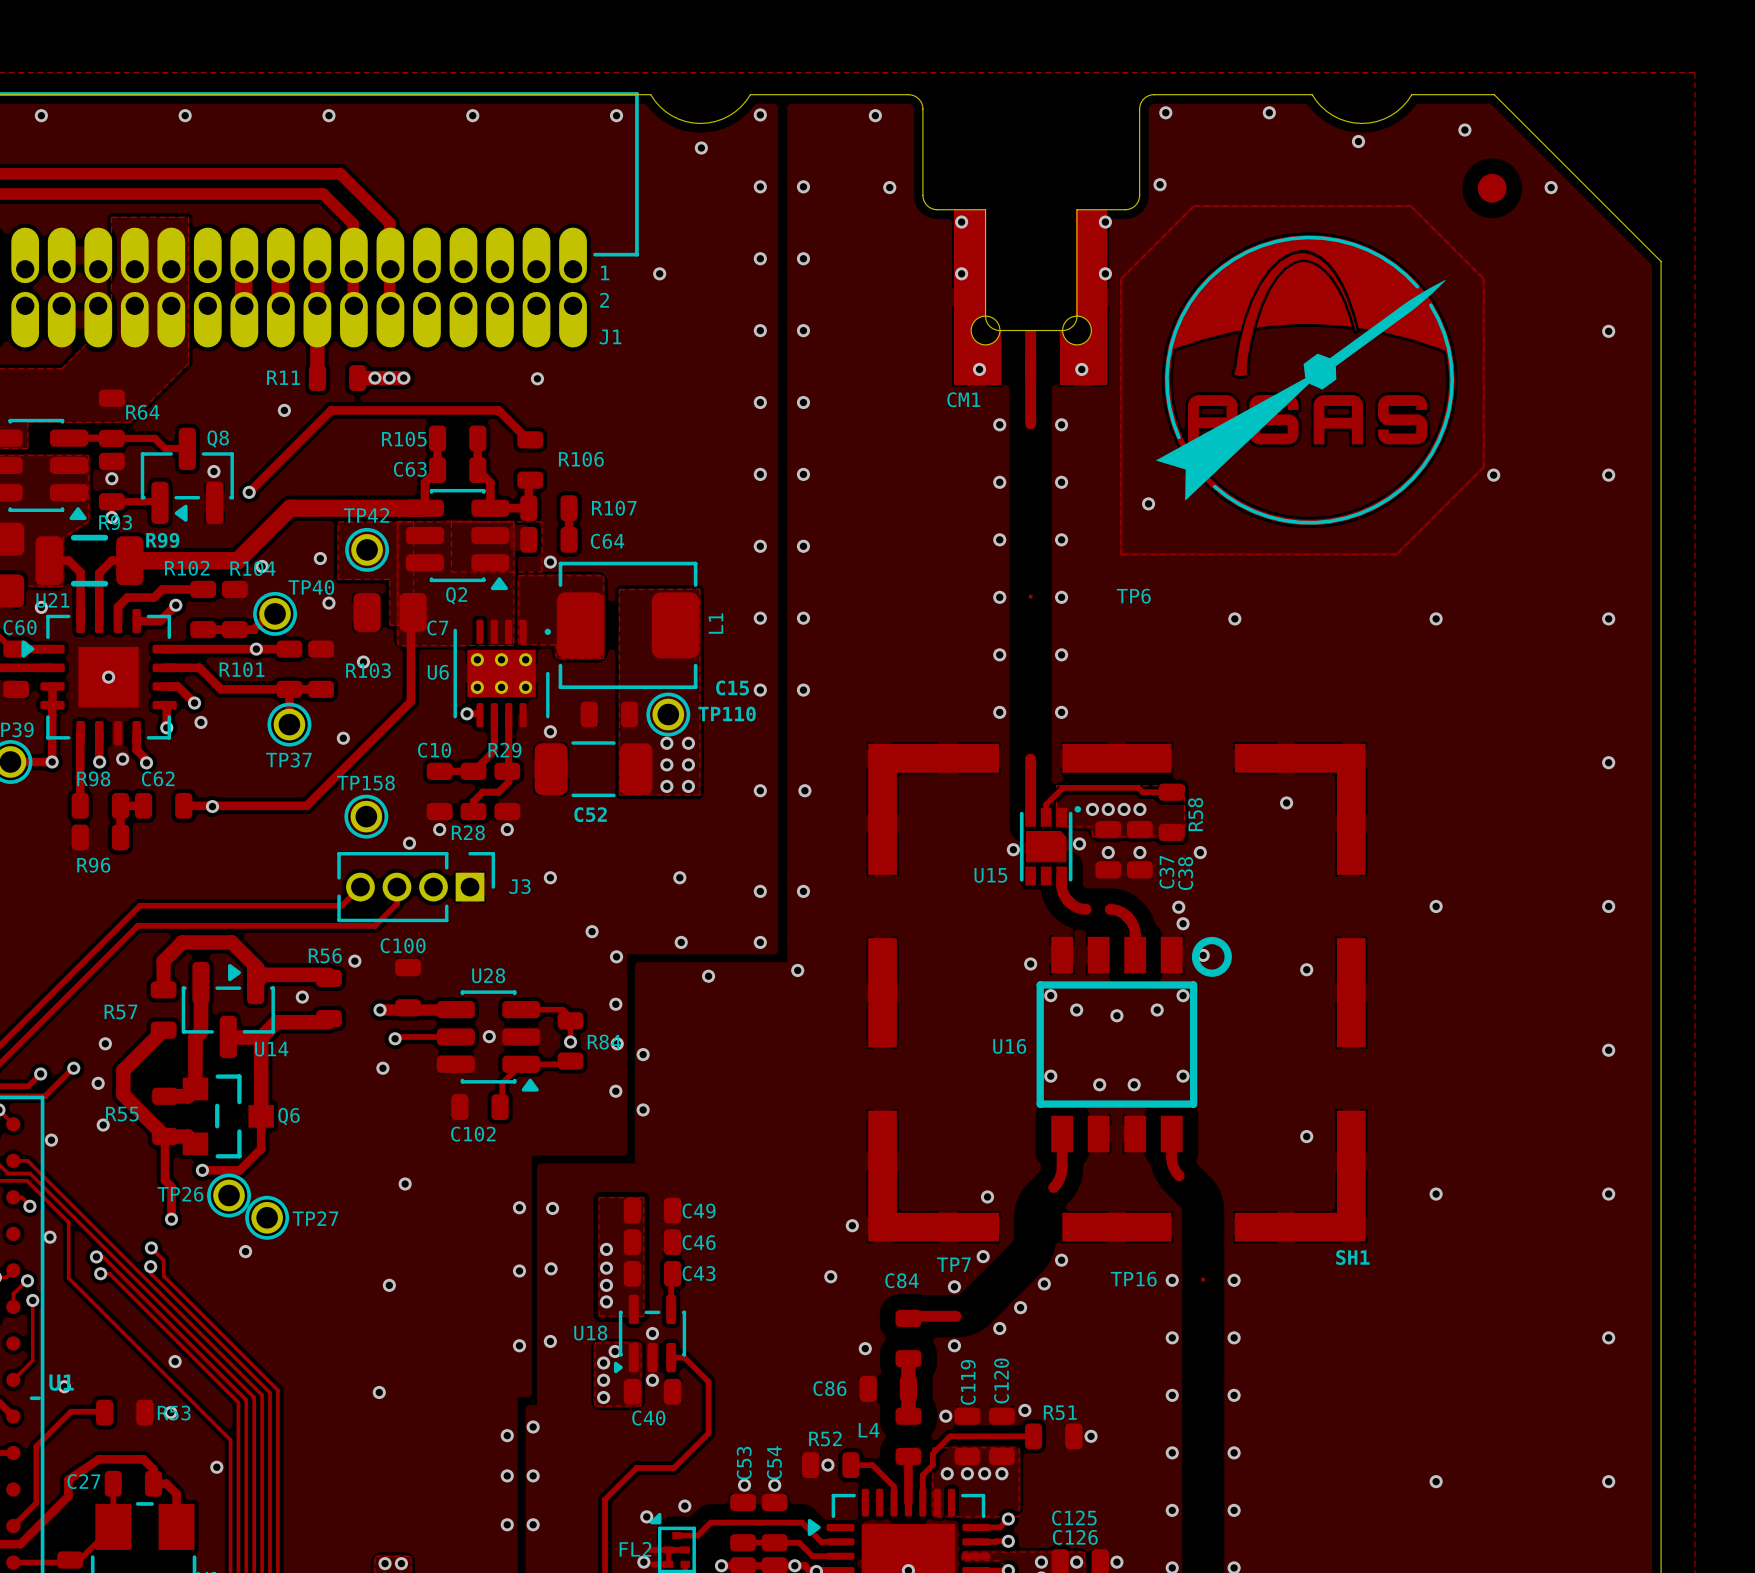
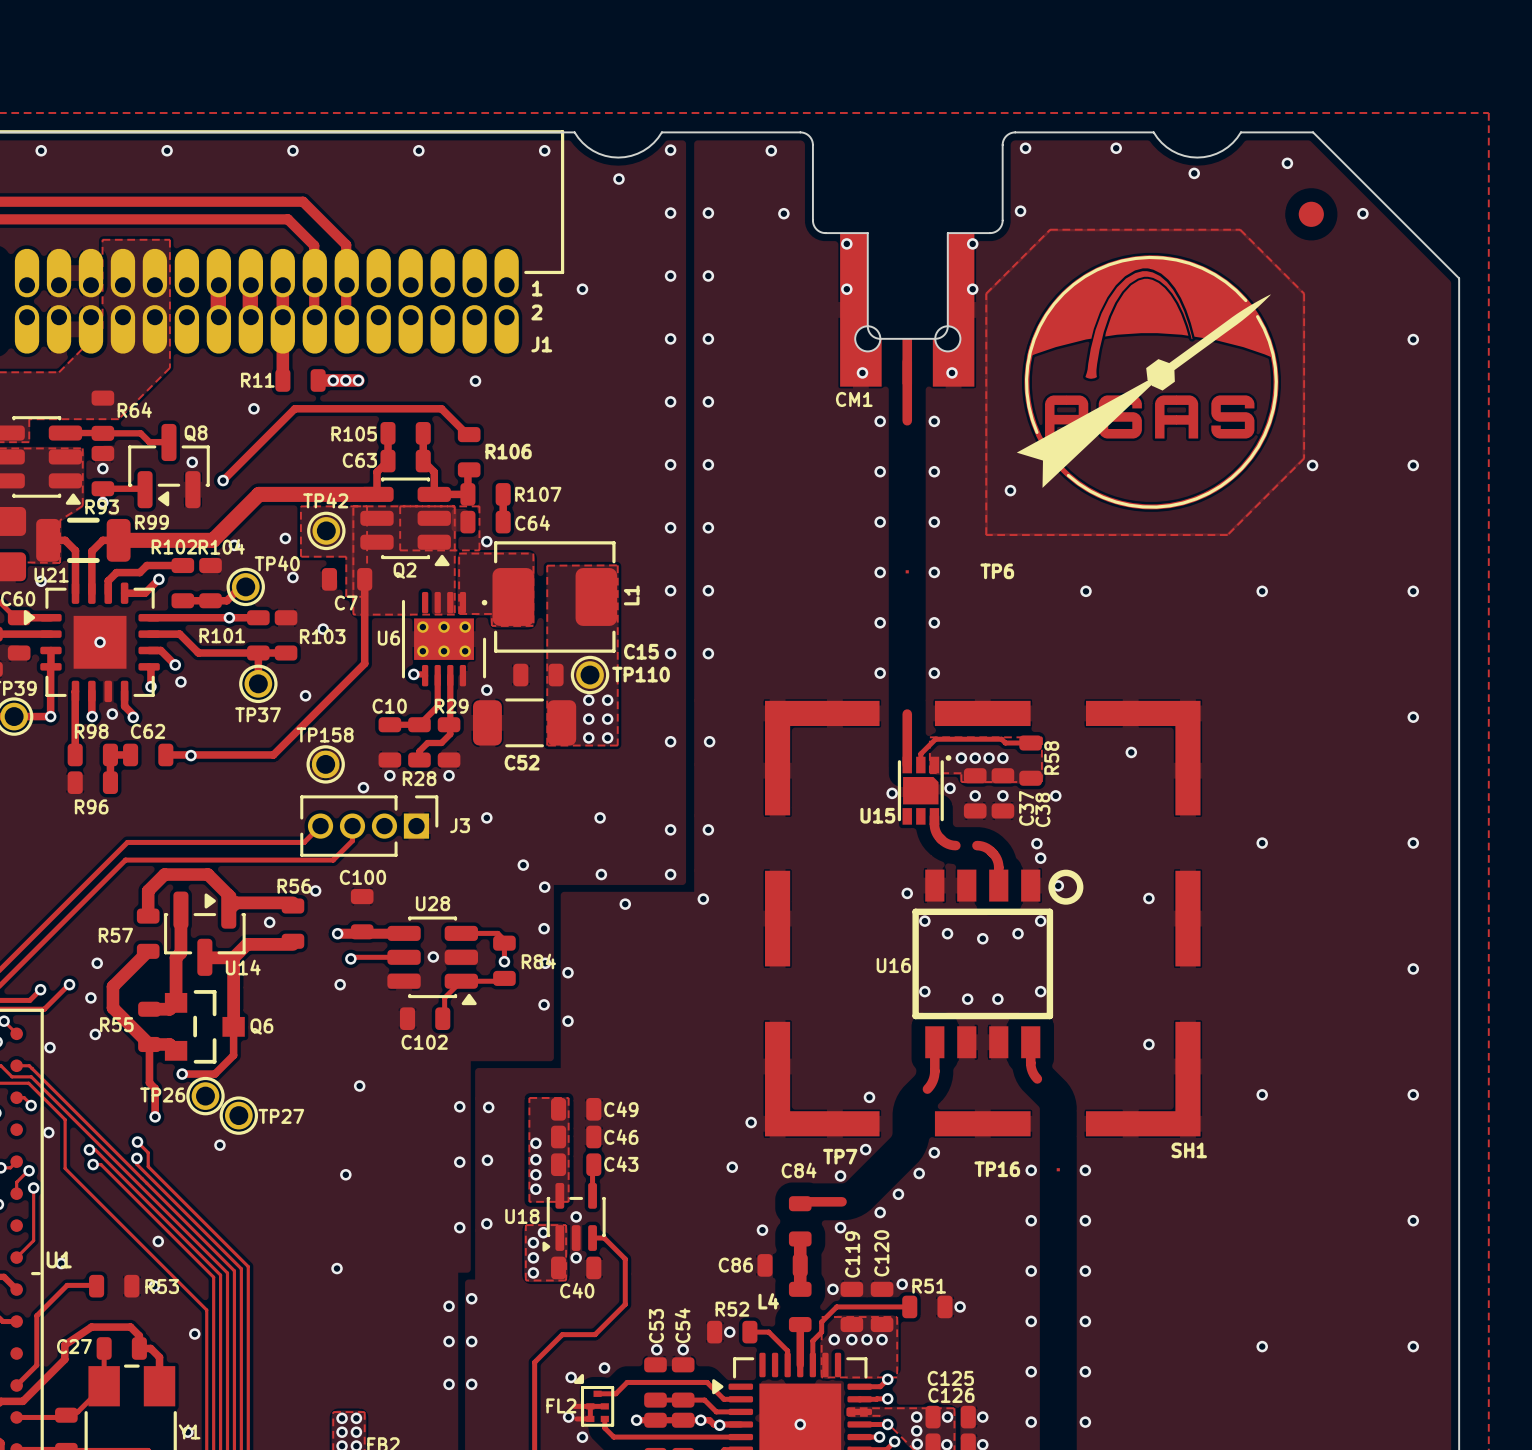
C7 footprint: [353, 593, 427, 632] -> [321, 568, 373, 591]
C7 name position: C7 (437, 627) -> C7 (346, 603)

